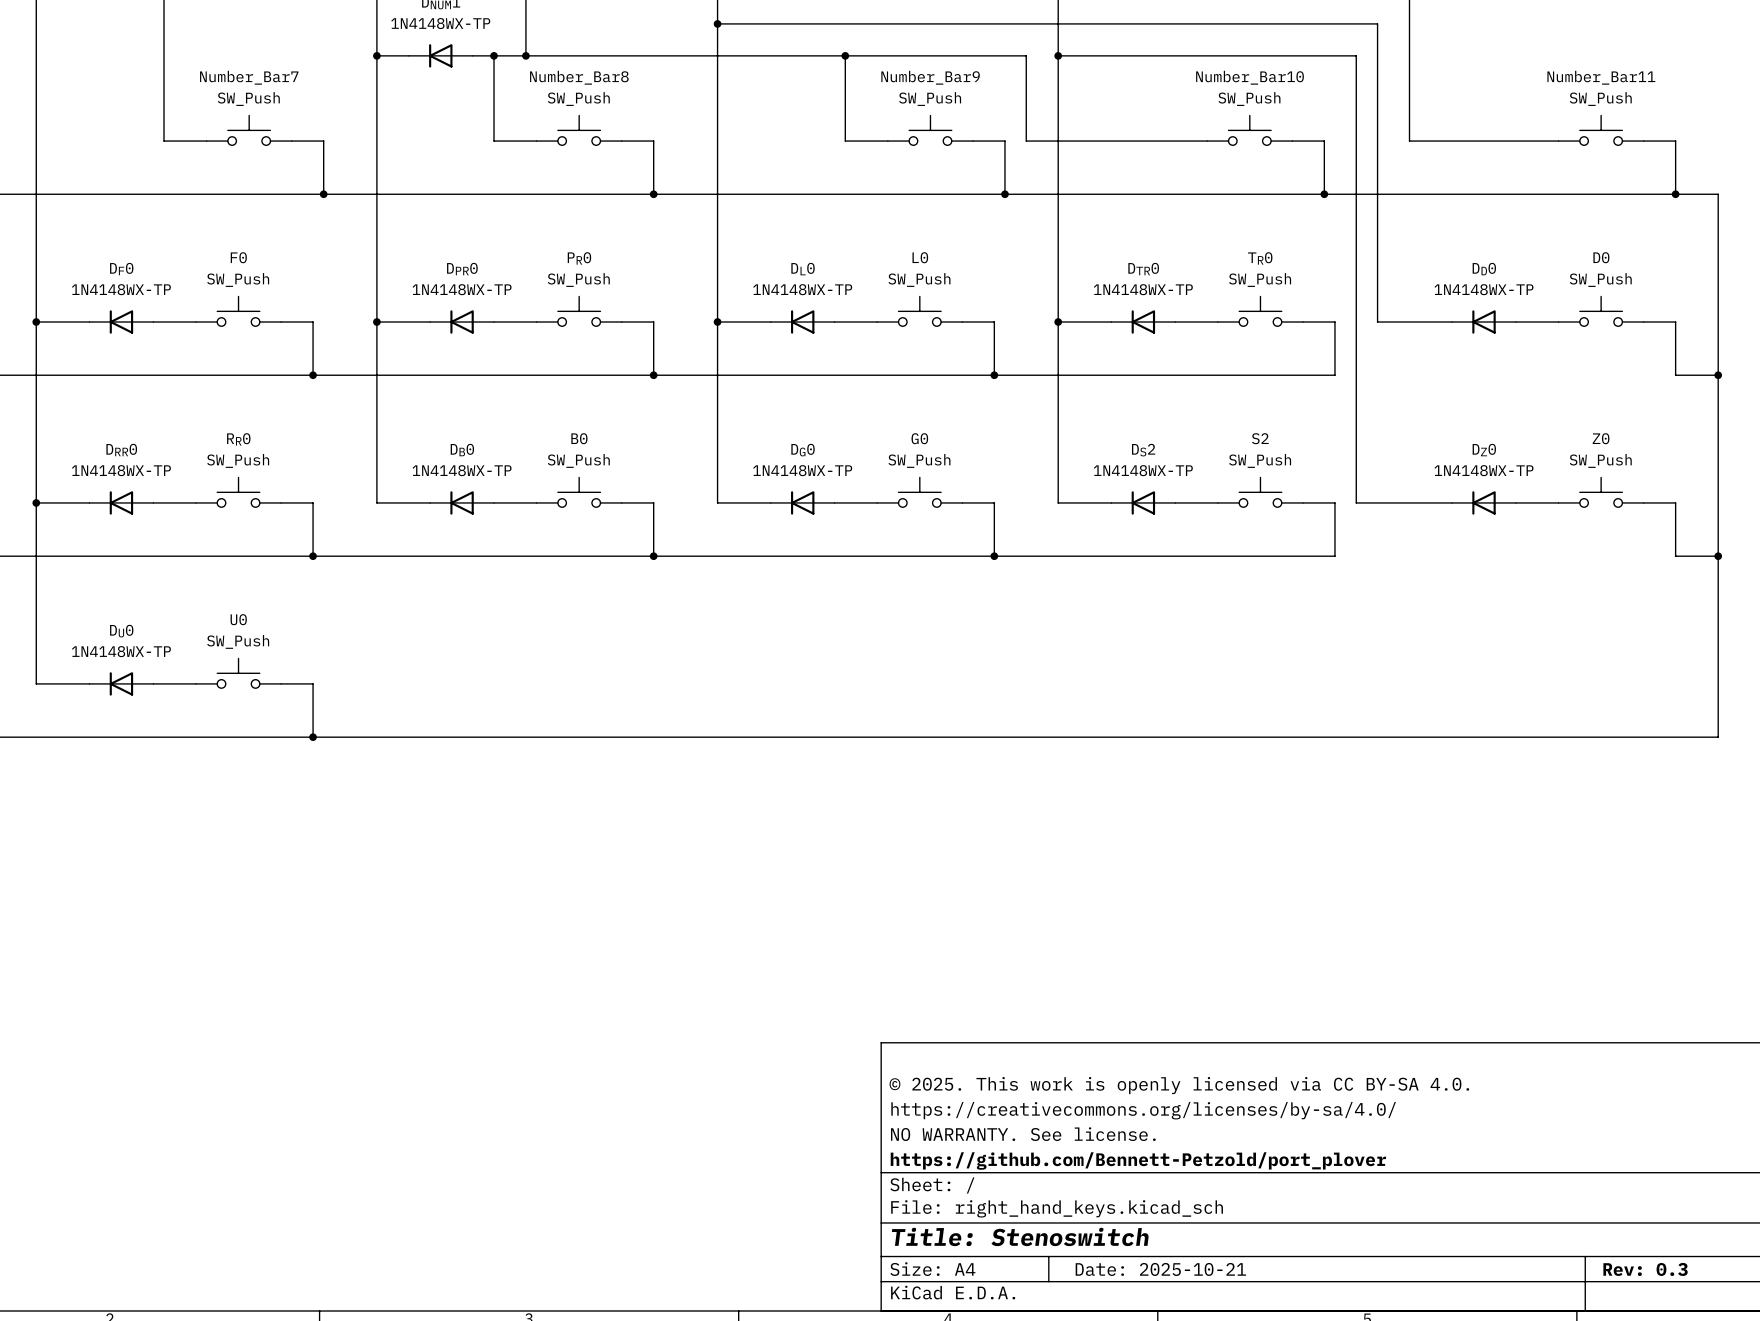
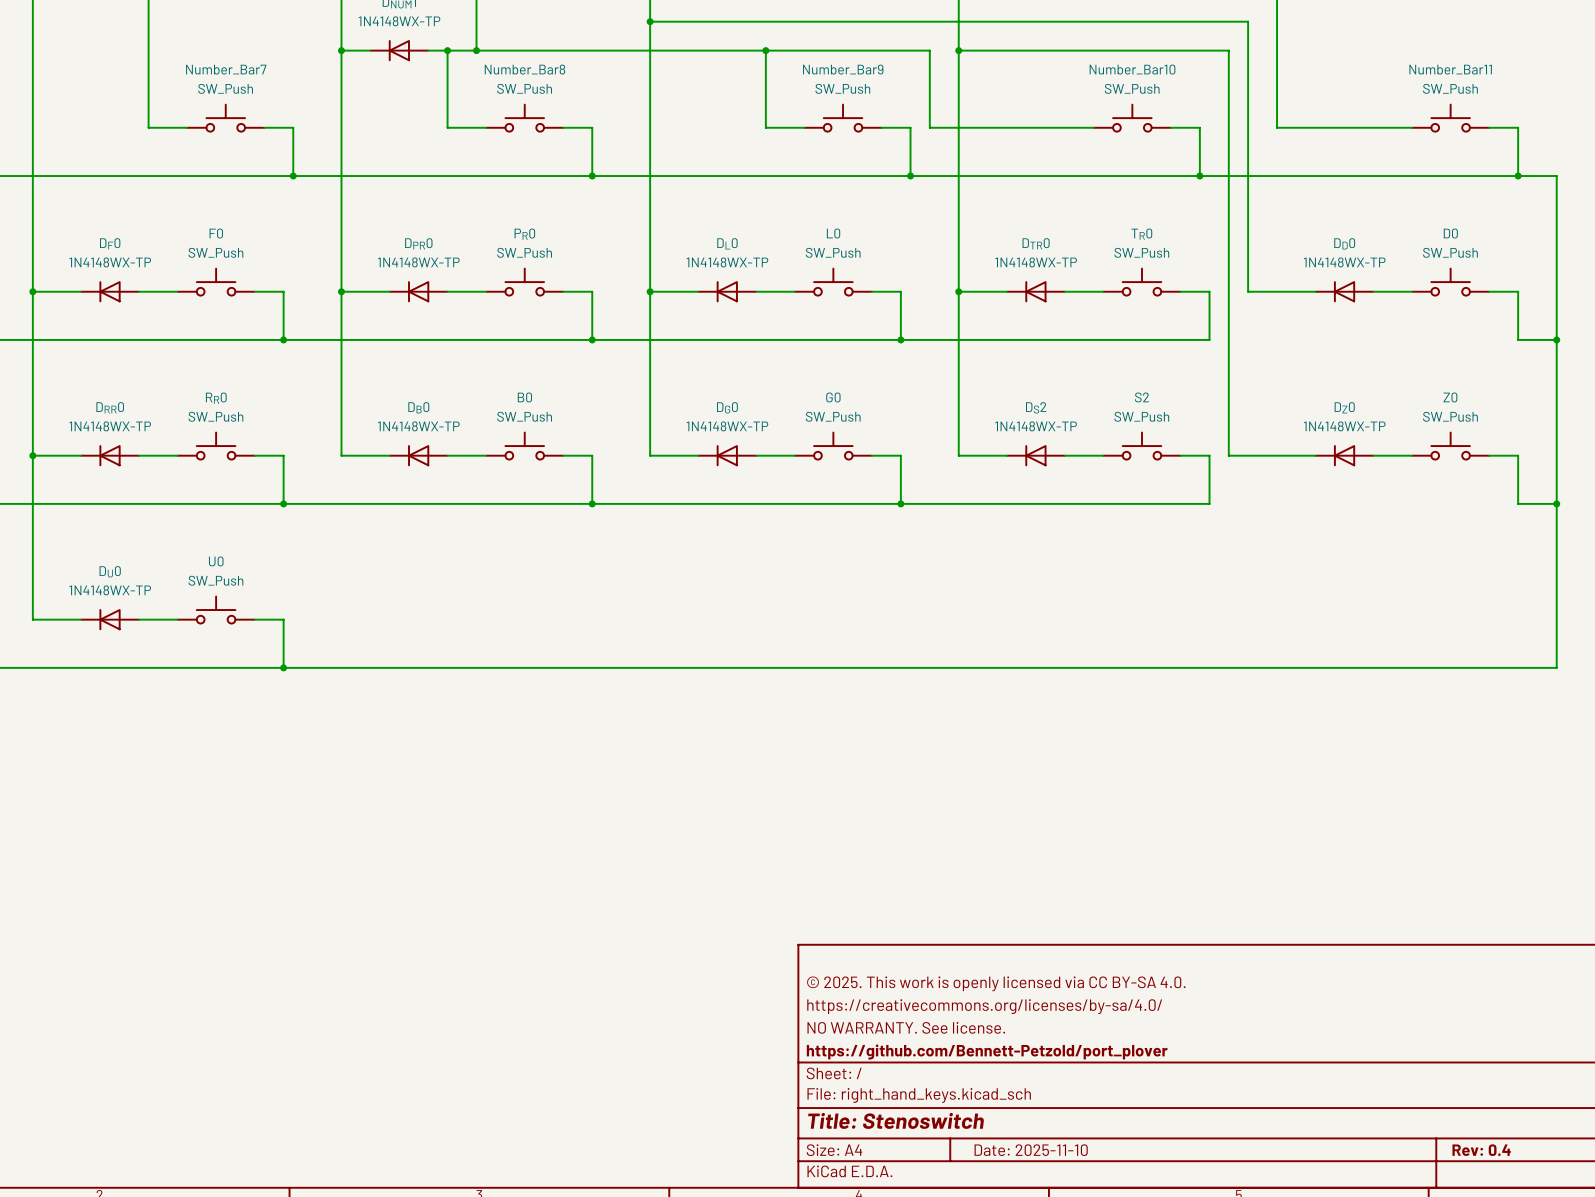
title block: Date: 2025-10-21 (1160, 1269) -> Date: 2025-11-10 (1031, 1150)
title block: Rev: 0.3 (1645, 1269) -> Rev: 0.4 (1481, 1150)

